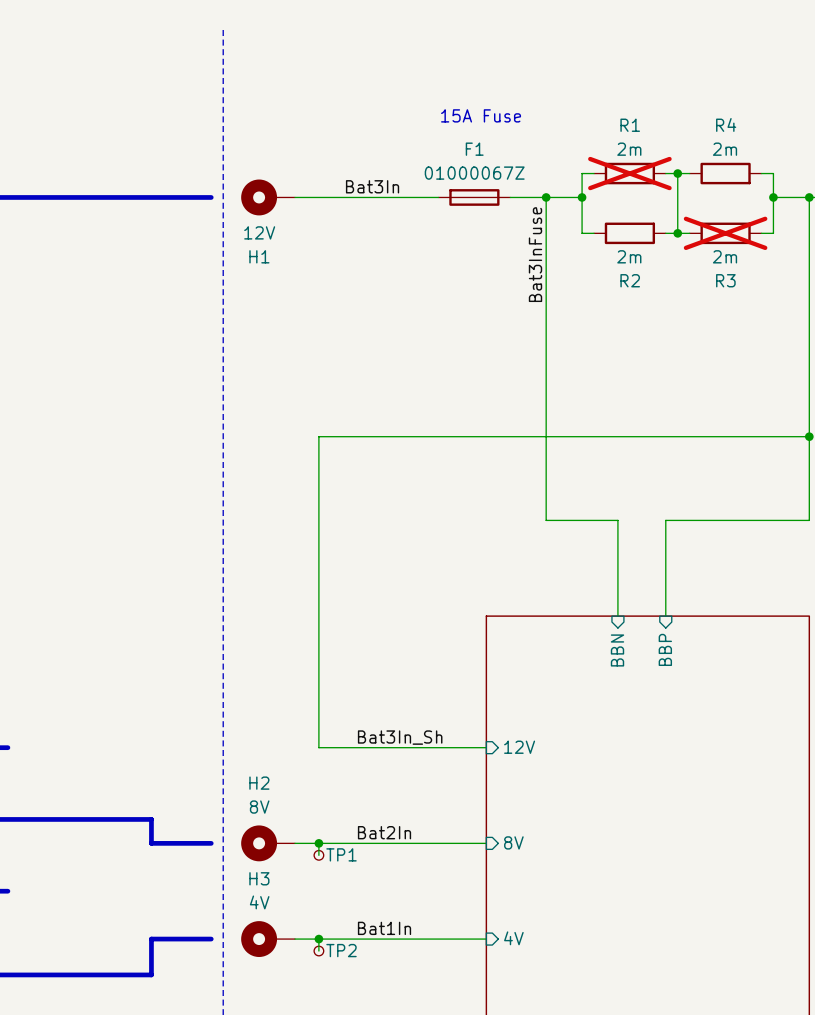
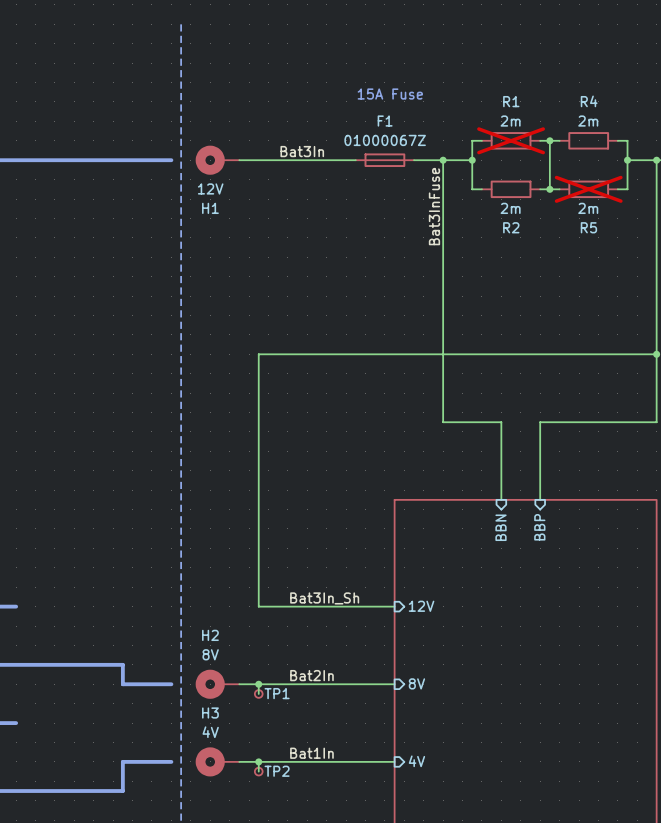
R3 name: R3 (725, 280) -> R5 (588, 227)
line: none -> (6, 606) (16, 606)
line: none -> (6, 723) (16, 723)

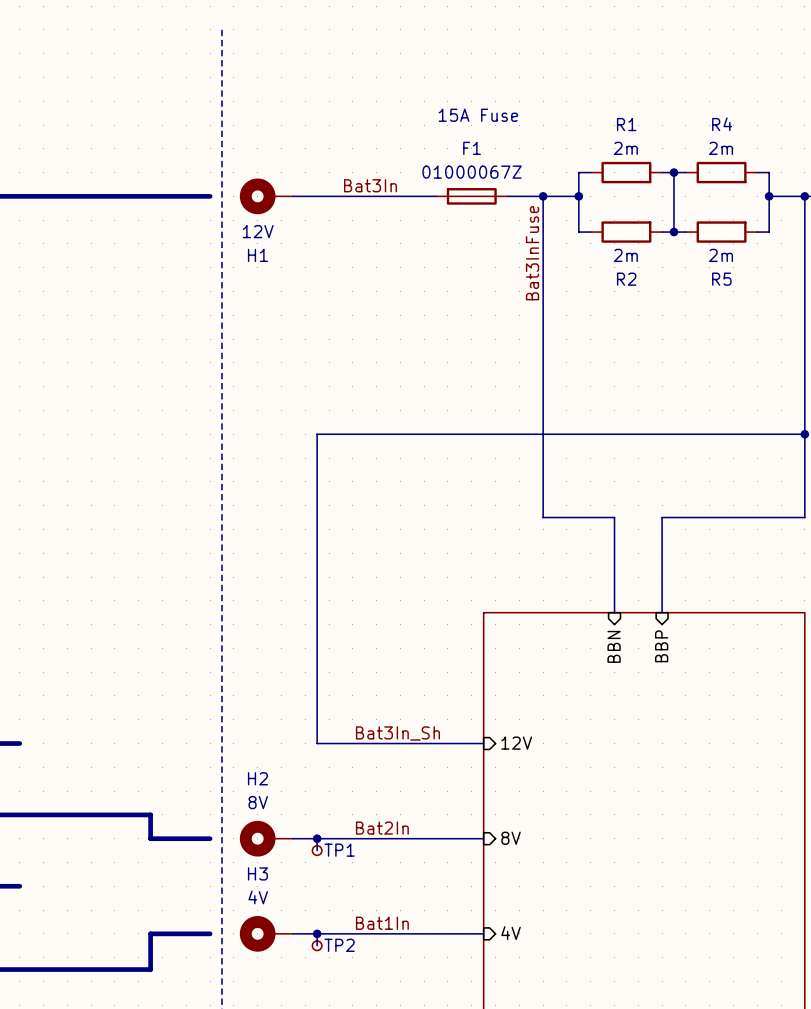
R1 do-not-place cross: (511, 140) -> none
R5 do-not-place cross: (588, 189) -> none

